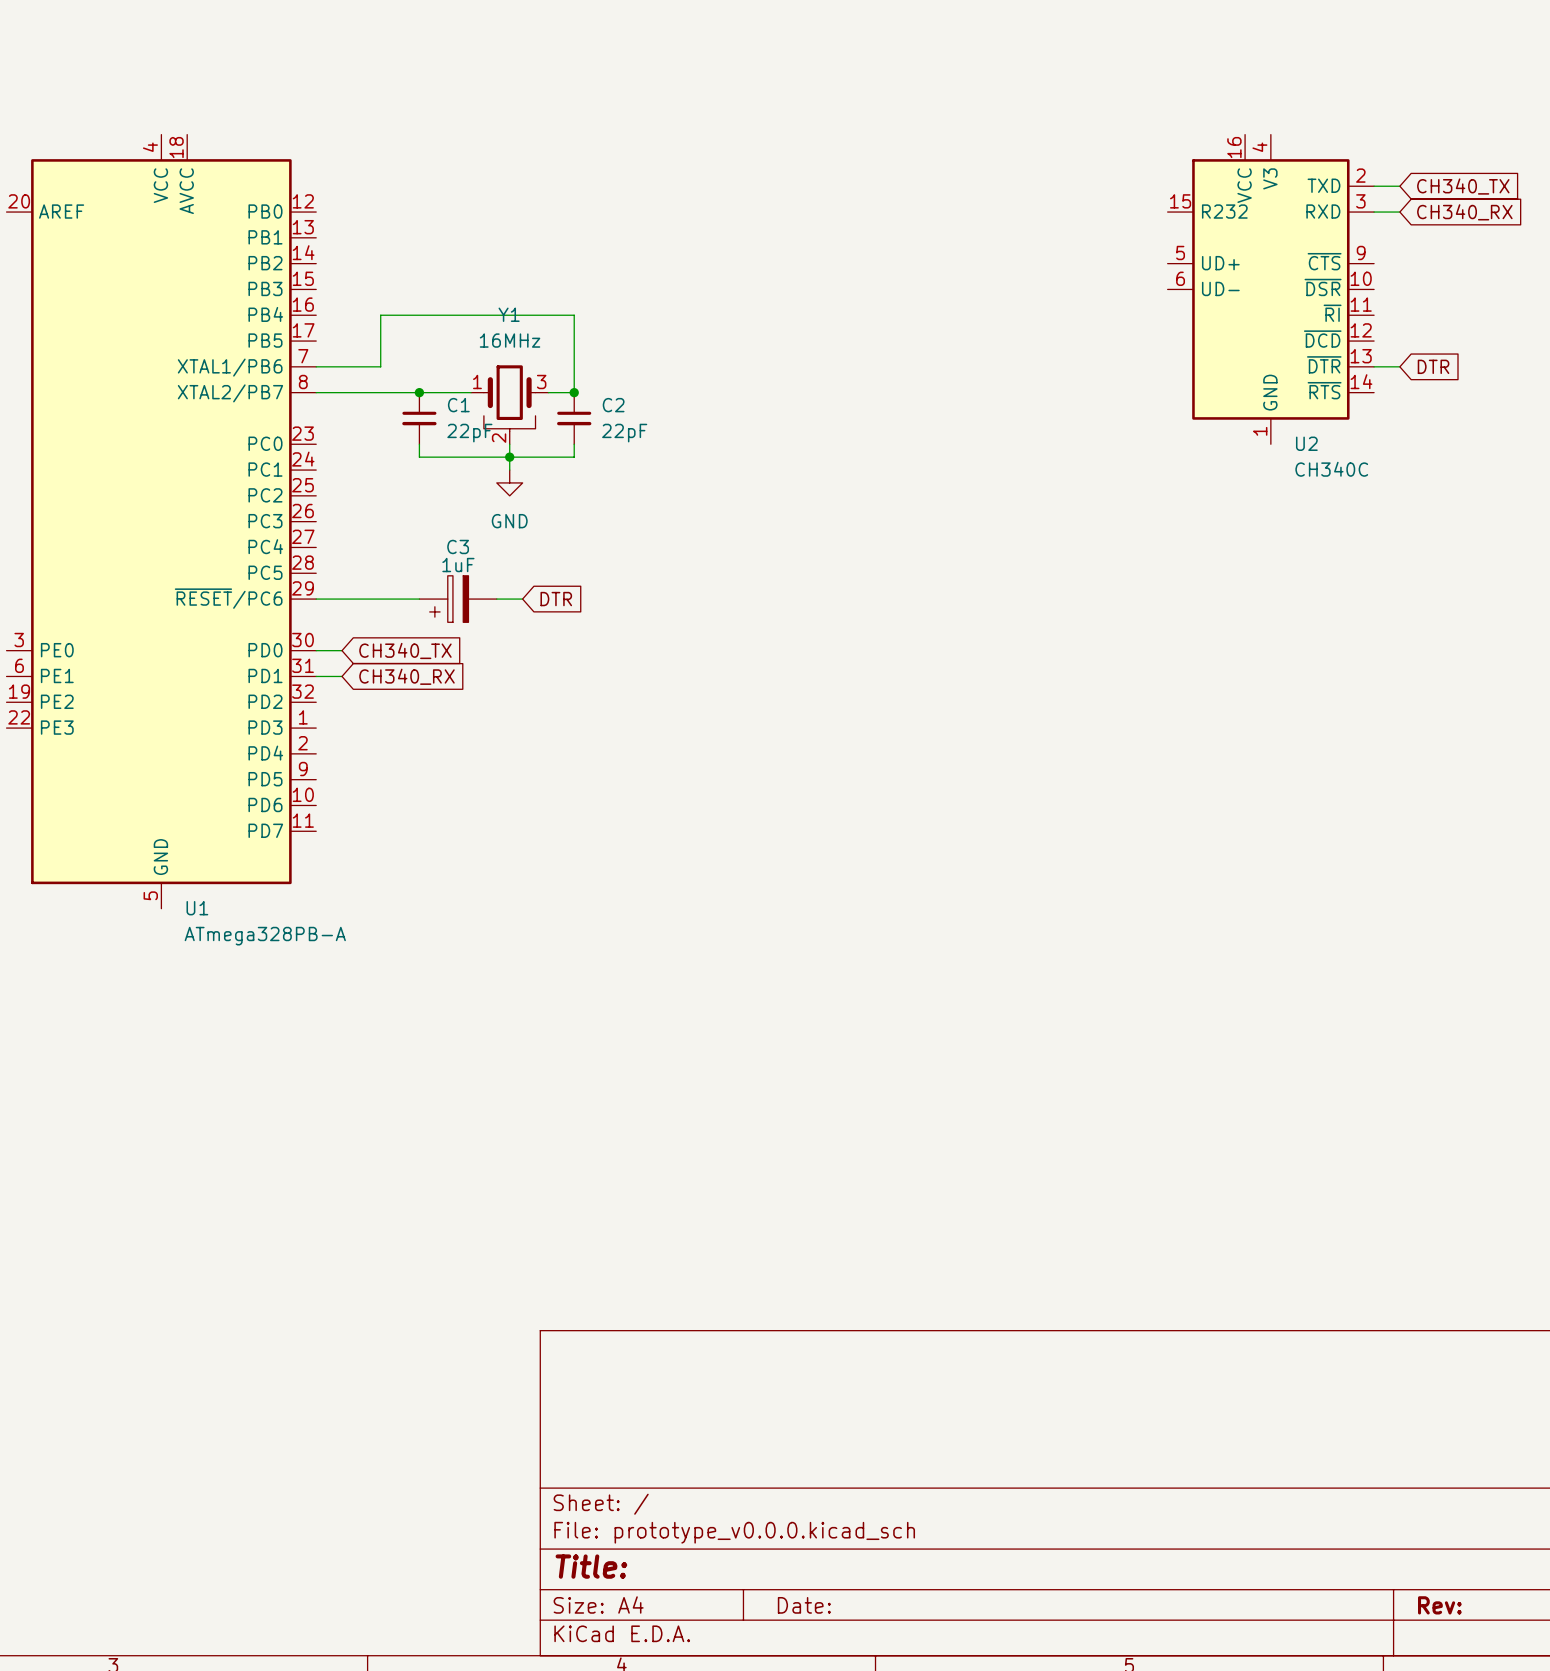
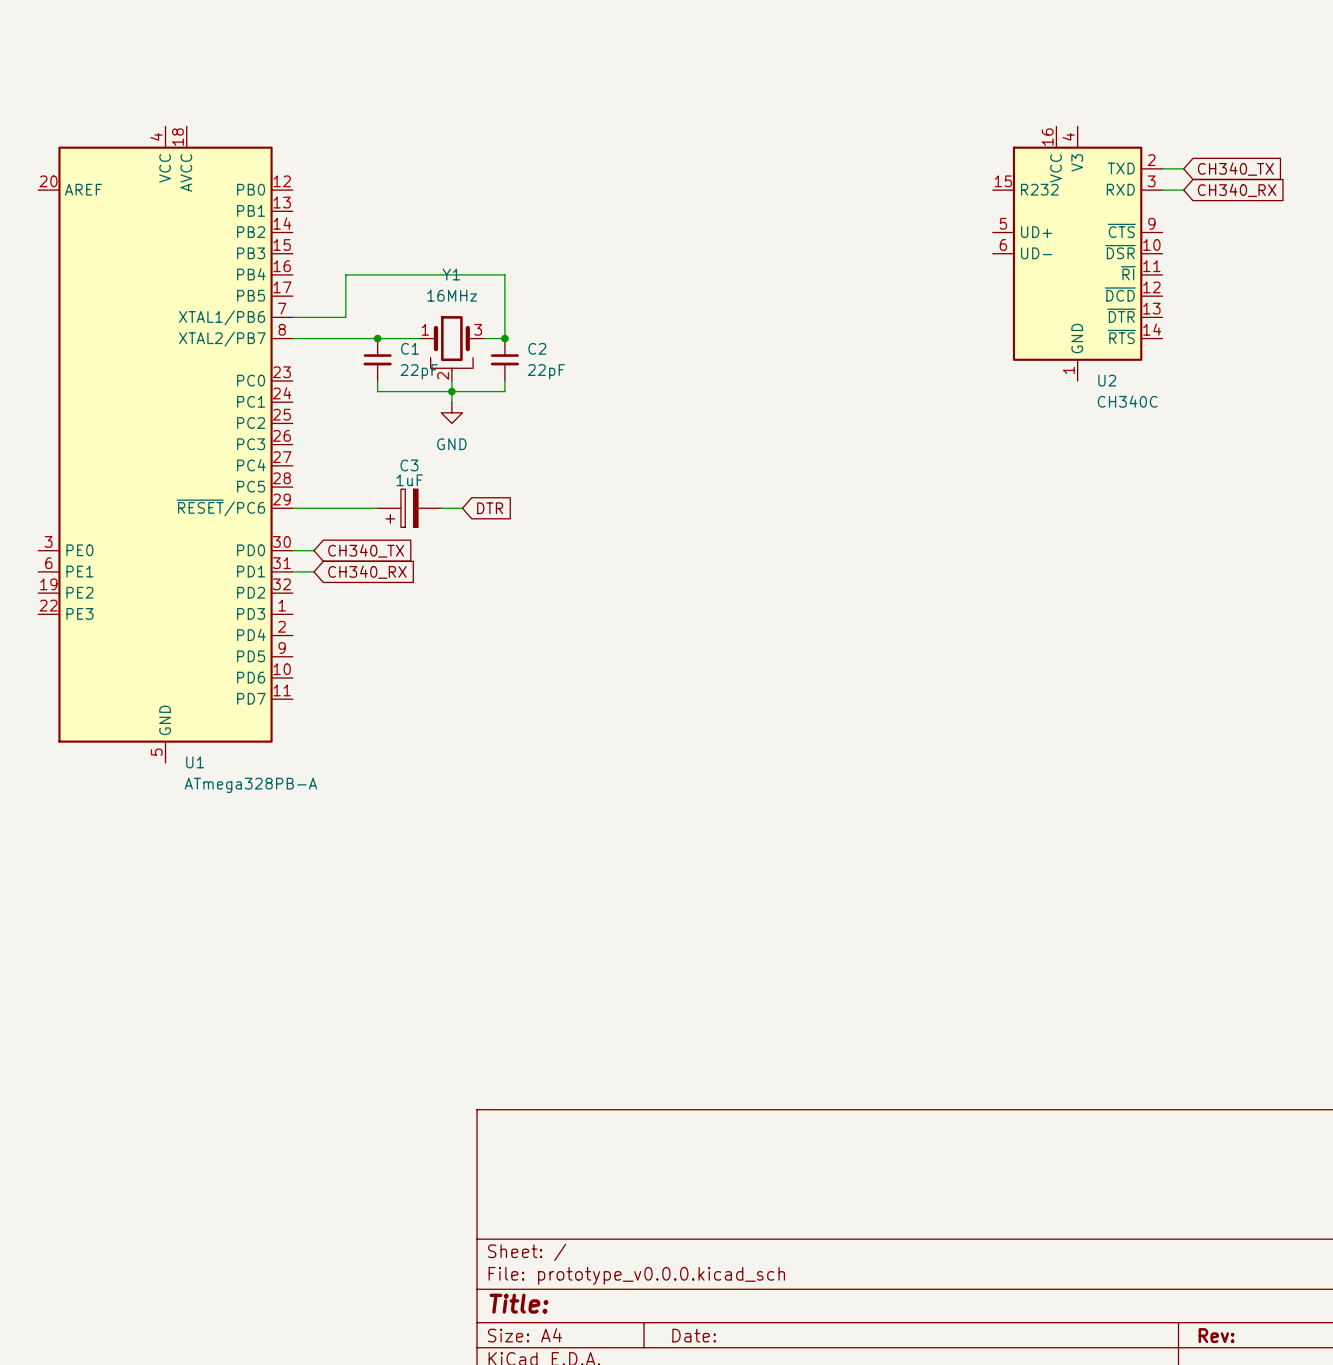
wire: (1374, 366) (1399, 366) -> none
global label: DTR (1433, 366) -> none

